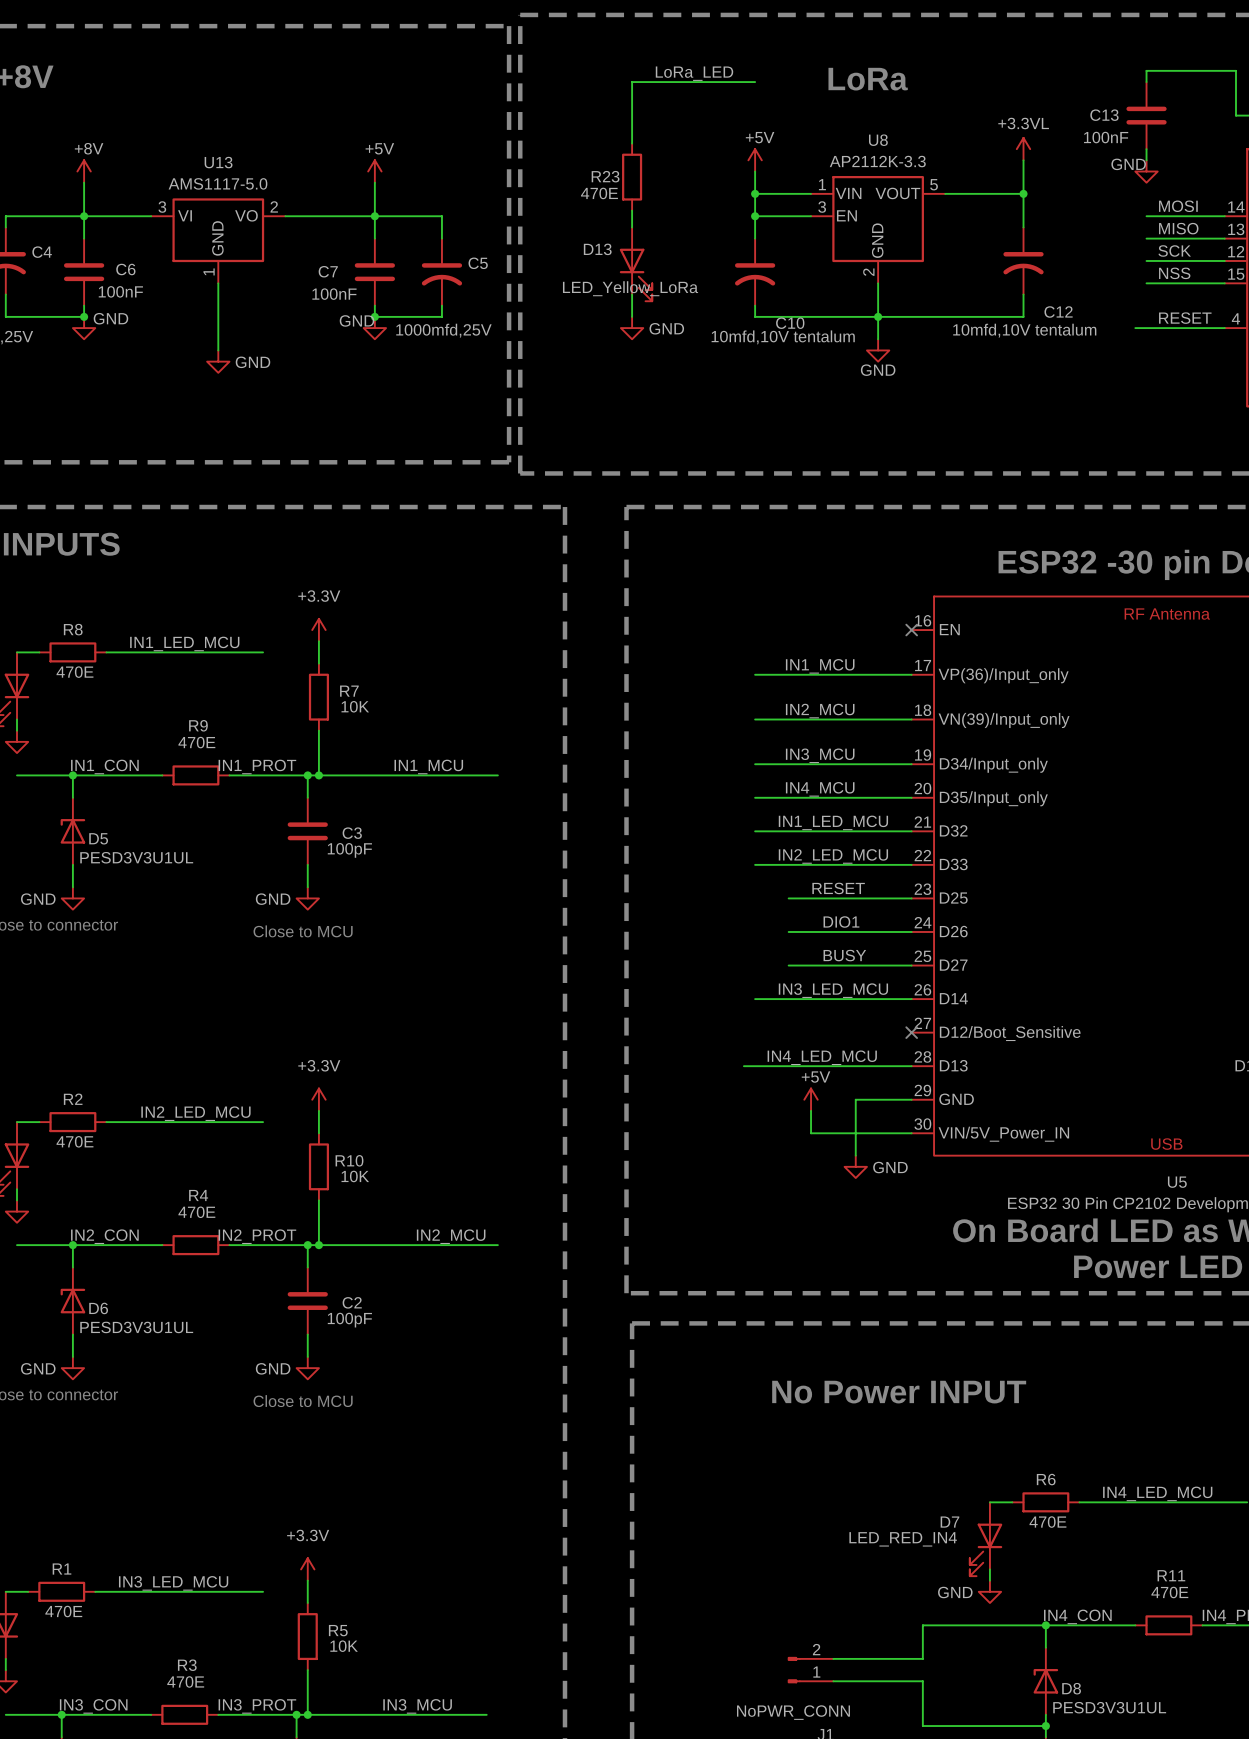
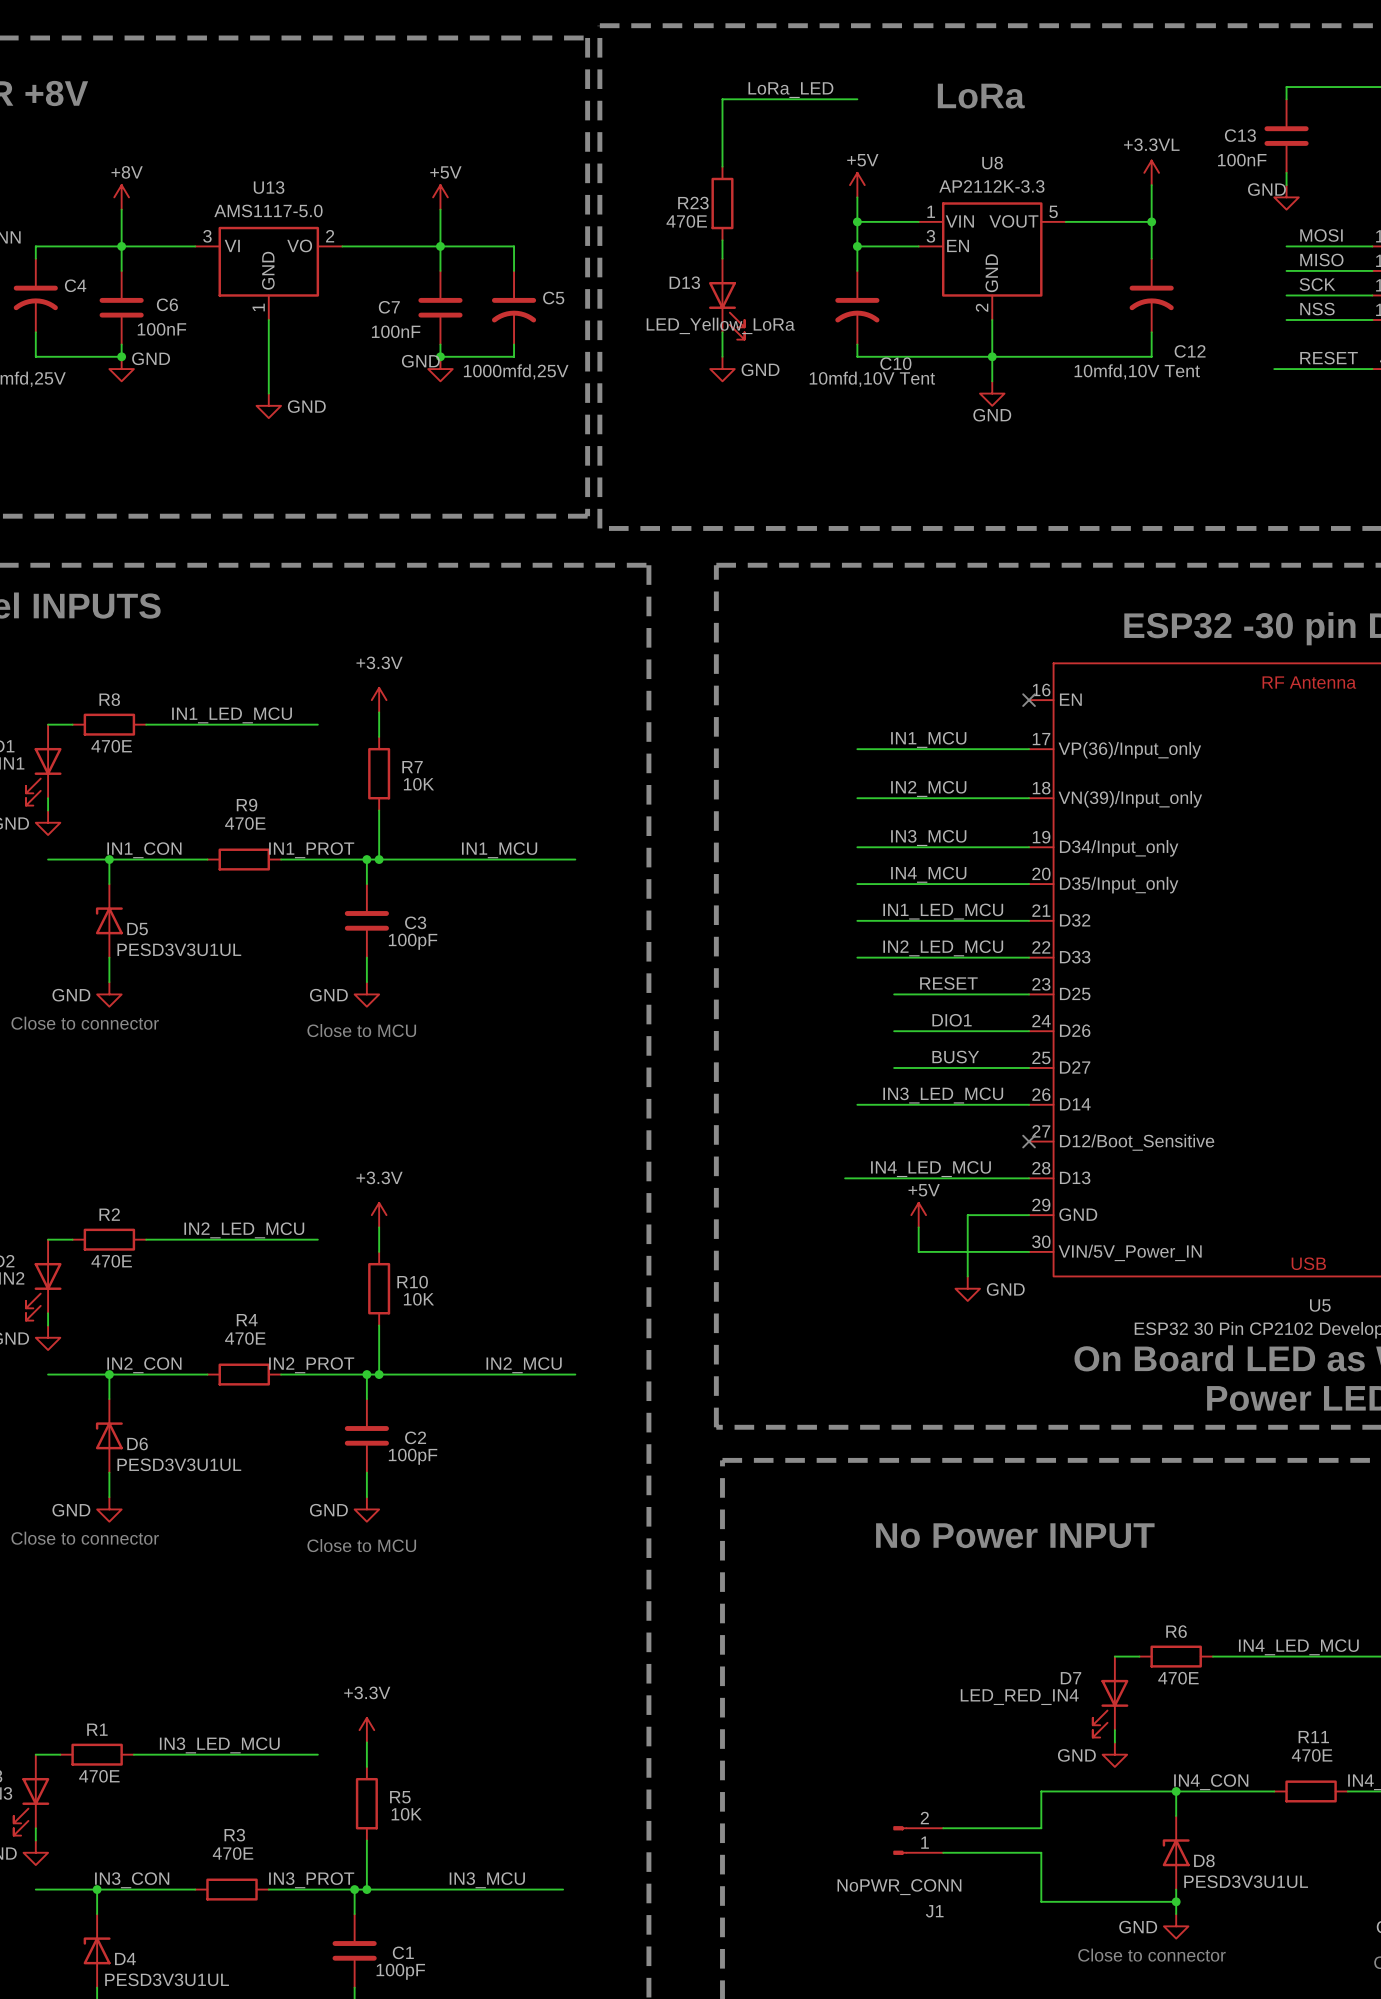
C12 value: 10mfd,10V tentalum (1024, 330) -> 10mfd,10V Tent (1137, 371)
C10 value: 10mfd,10V tentalum (783, 337) -> 10mfd,10V Tent (872, 379)

